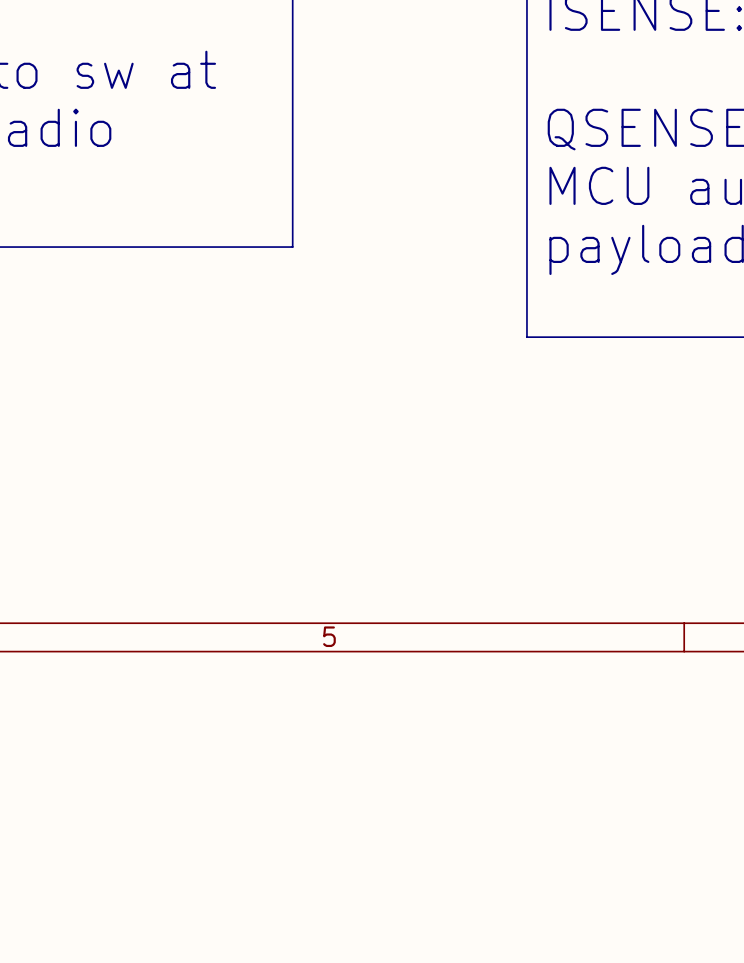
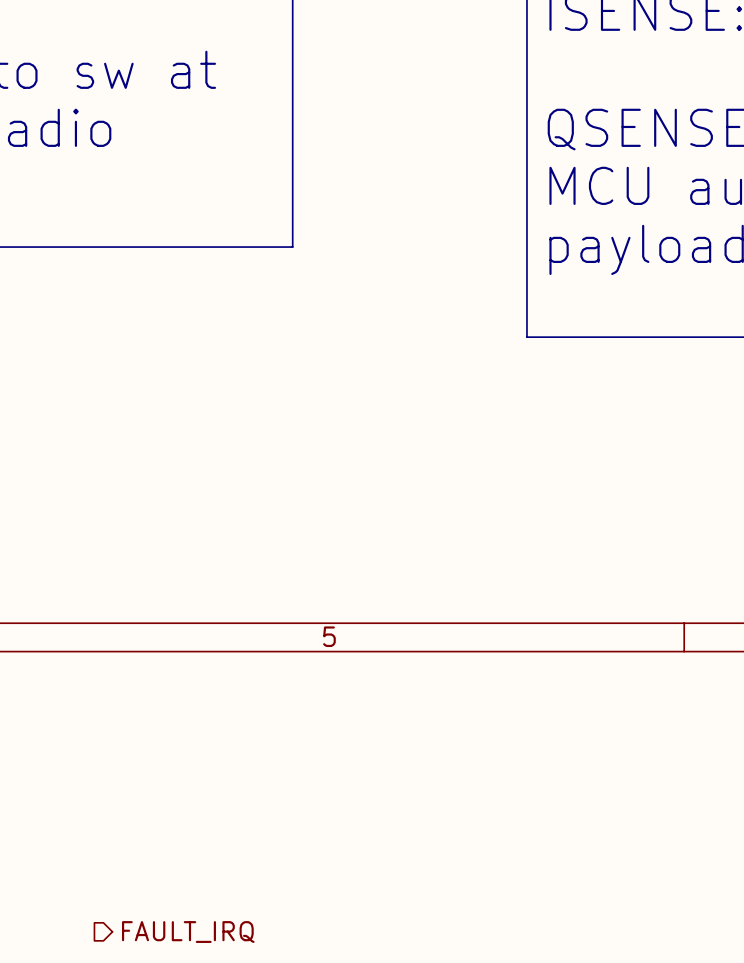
hierarchical label: none -> FAULT_IRQ (188, 932)

